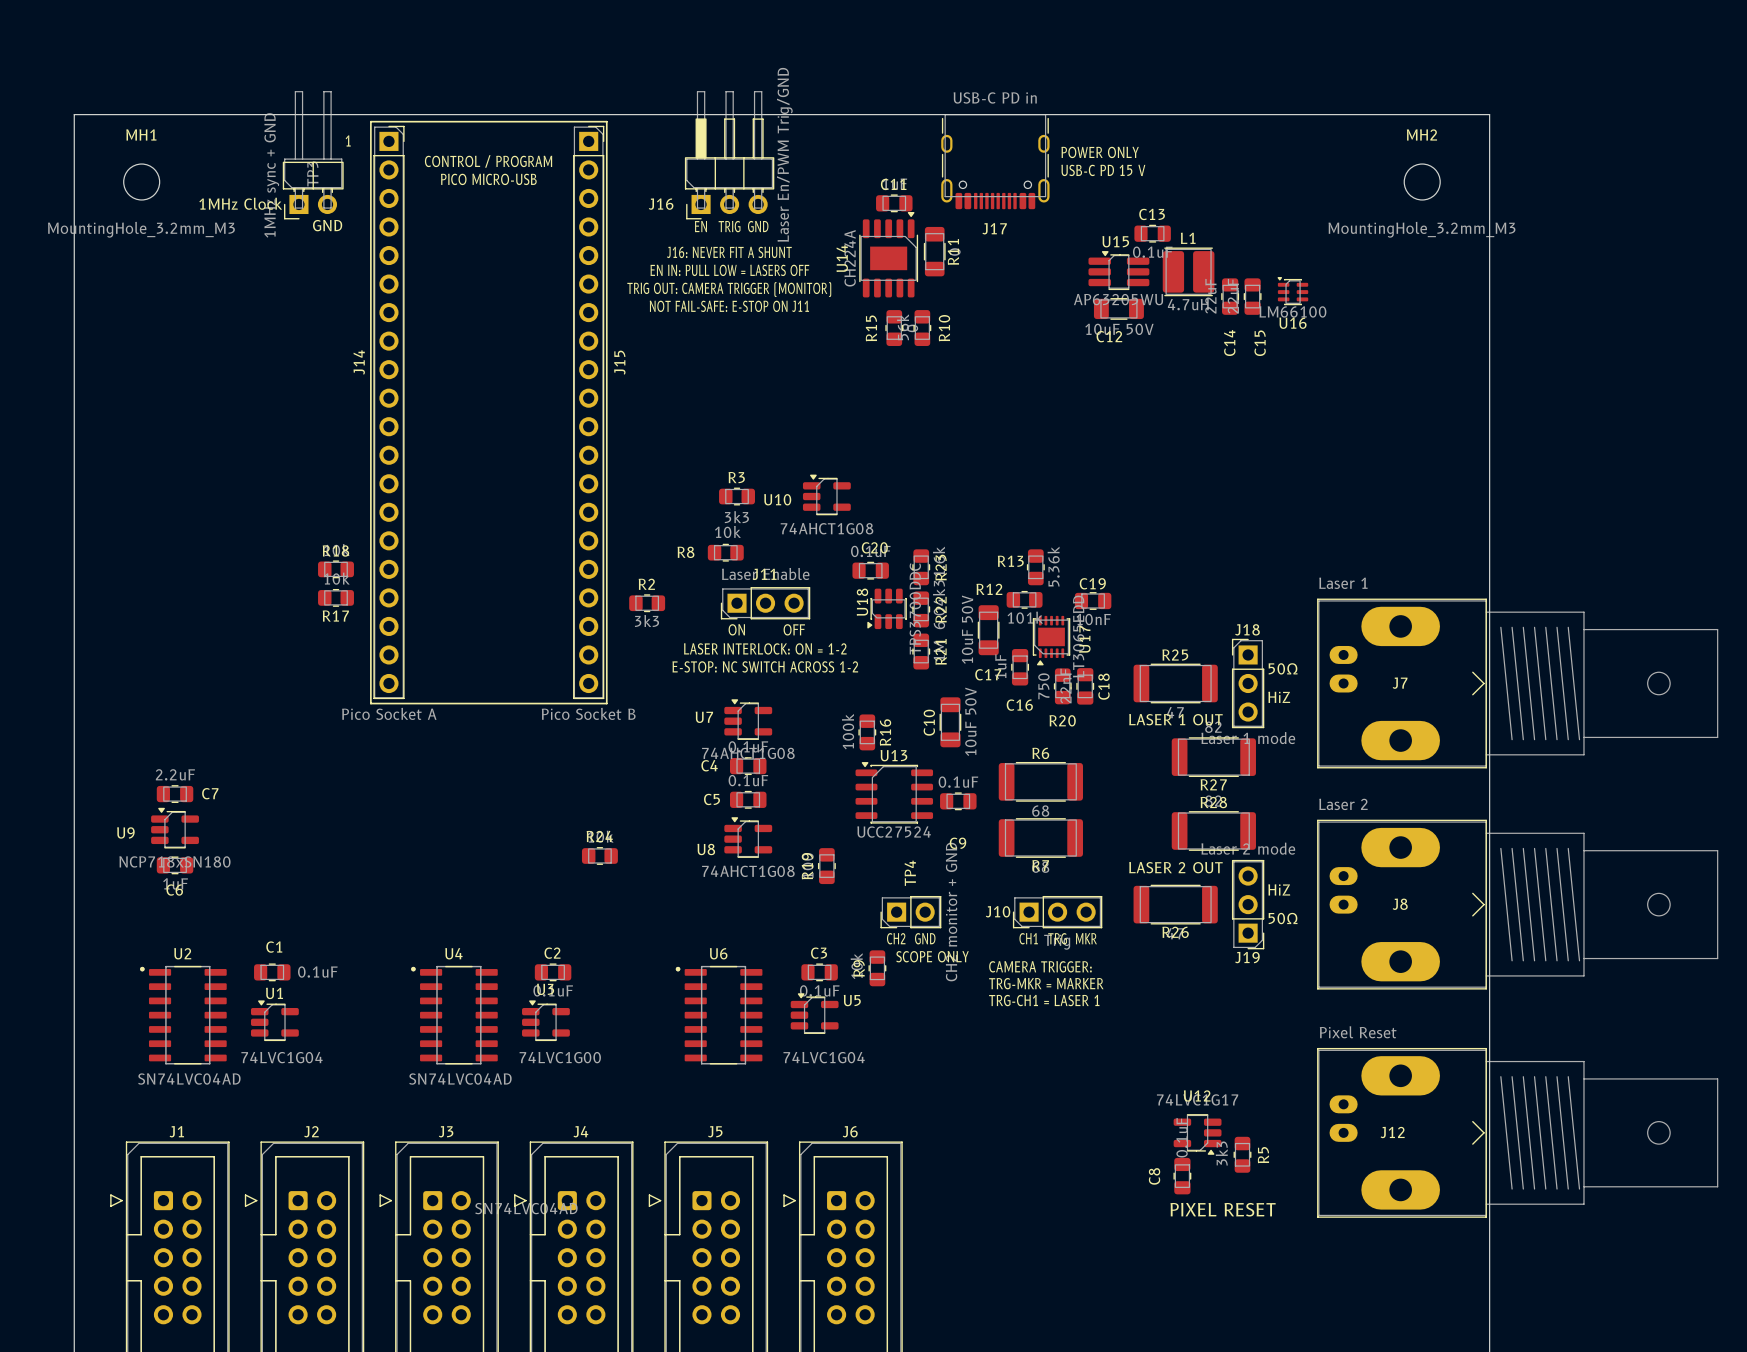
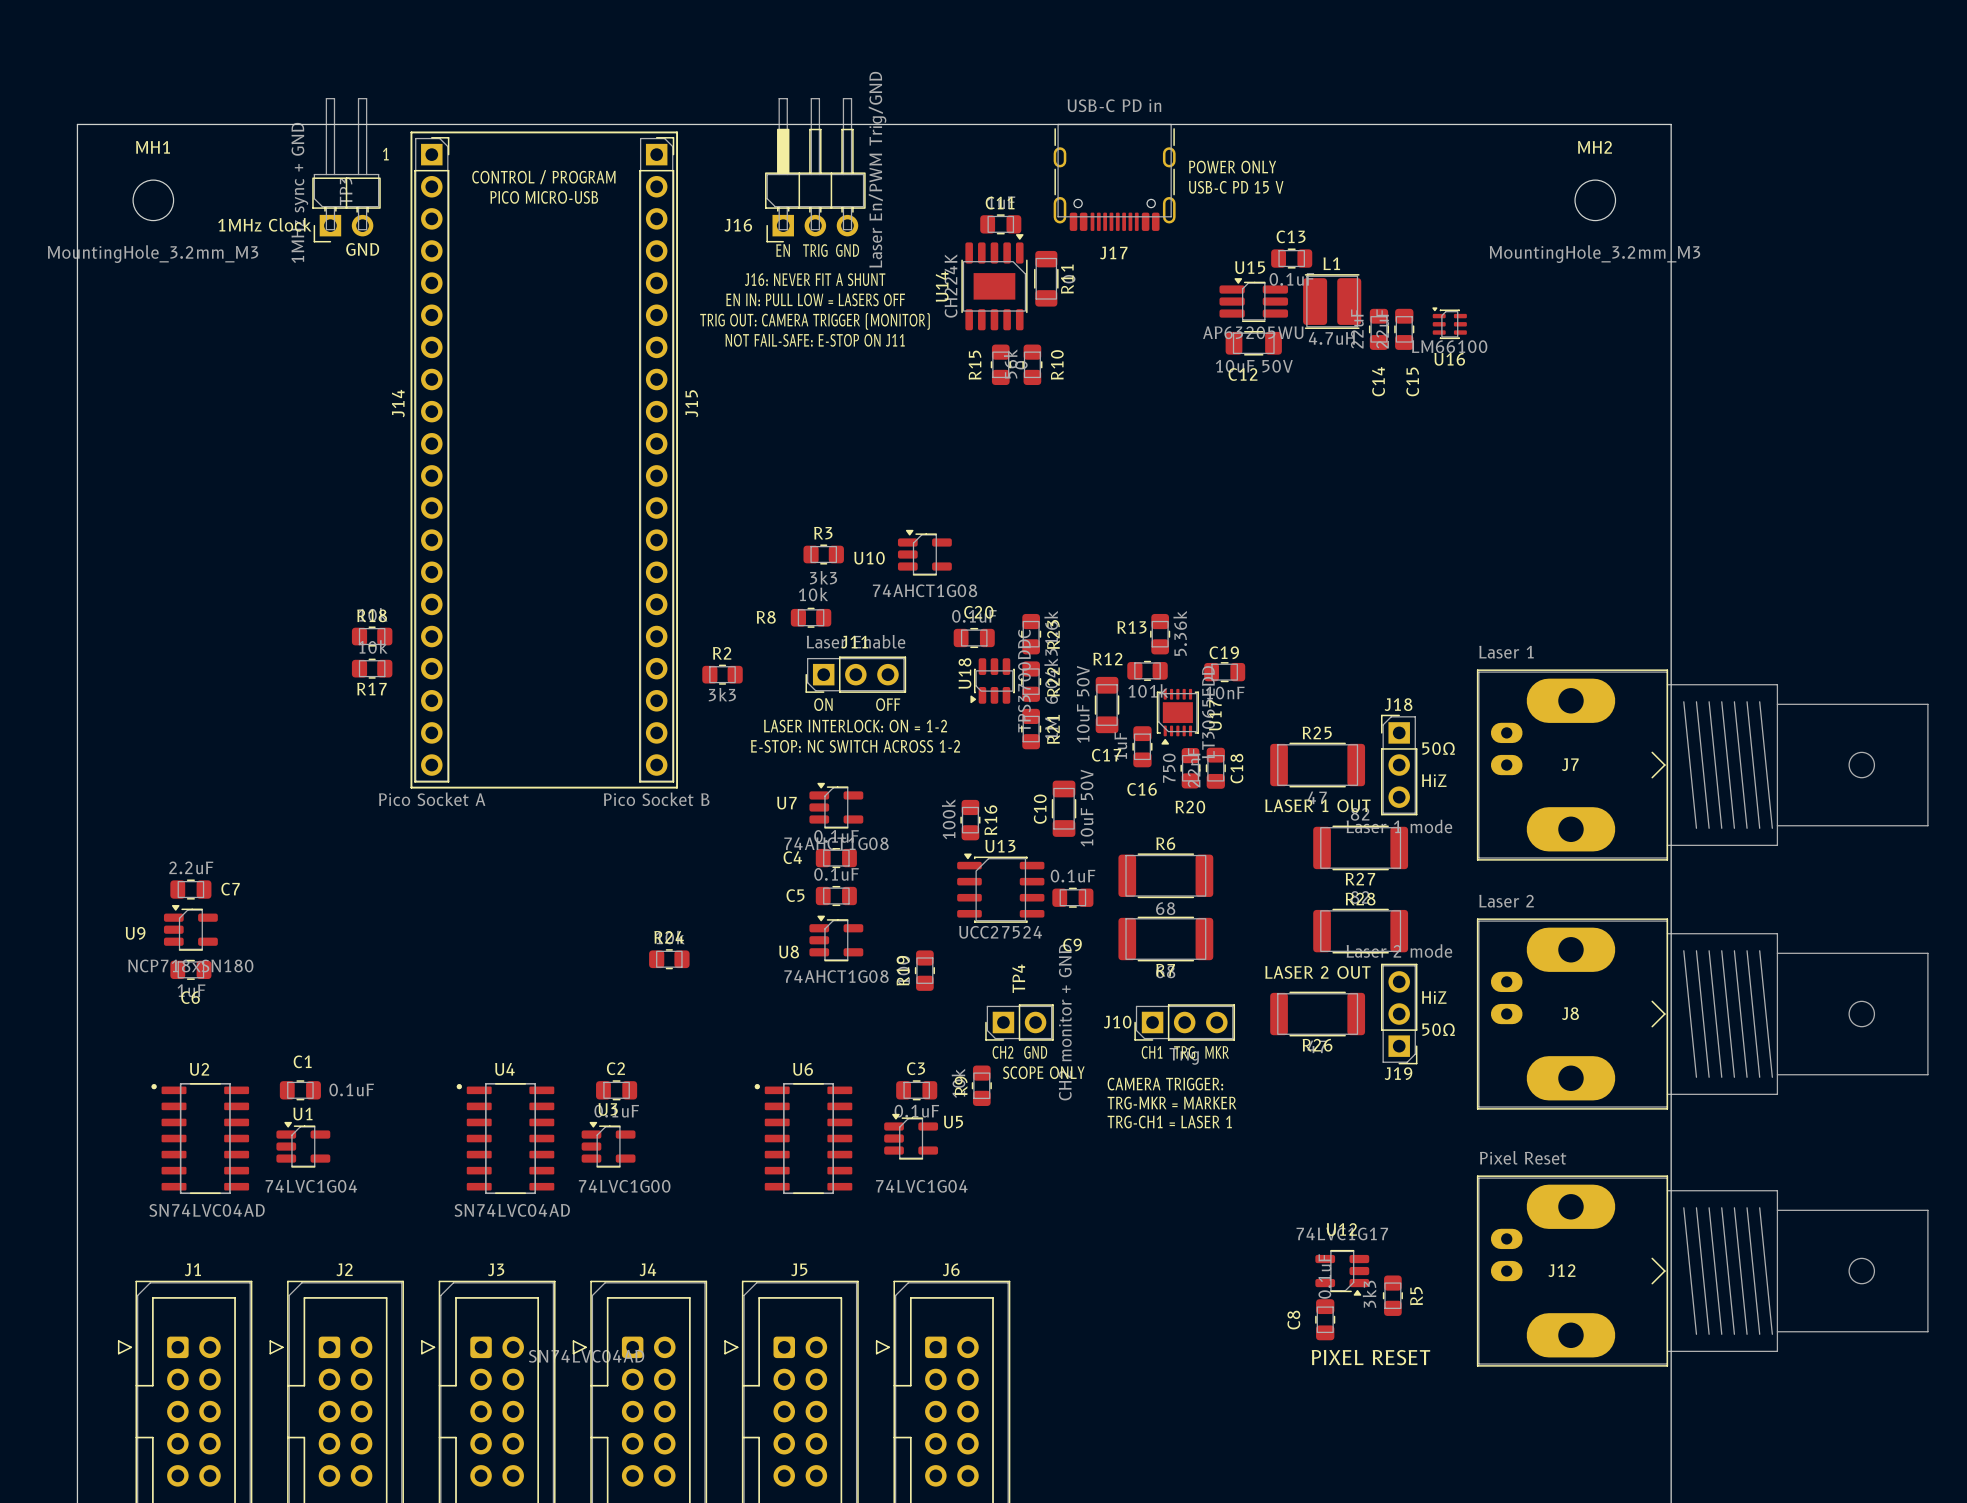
U14 value: CH224A (850, 258) -> CH224K (951, 286)

